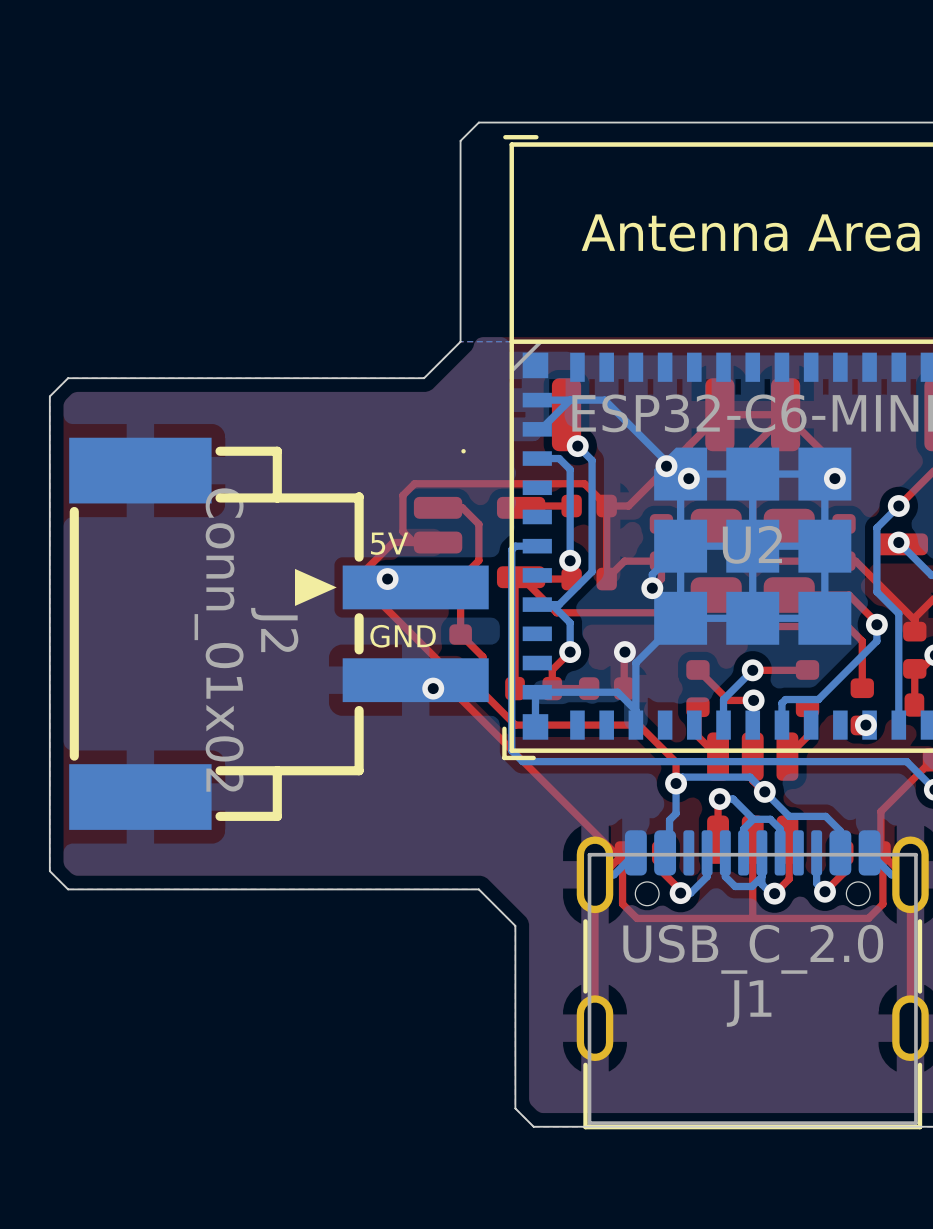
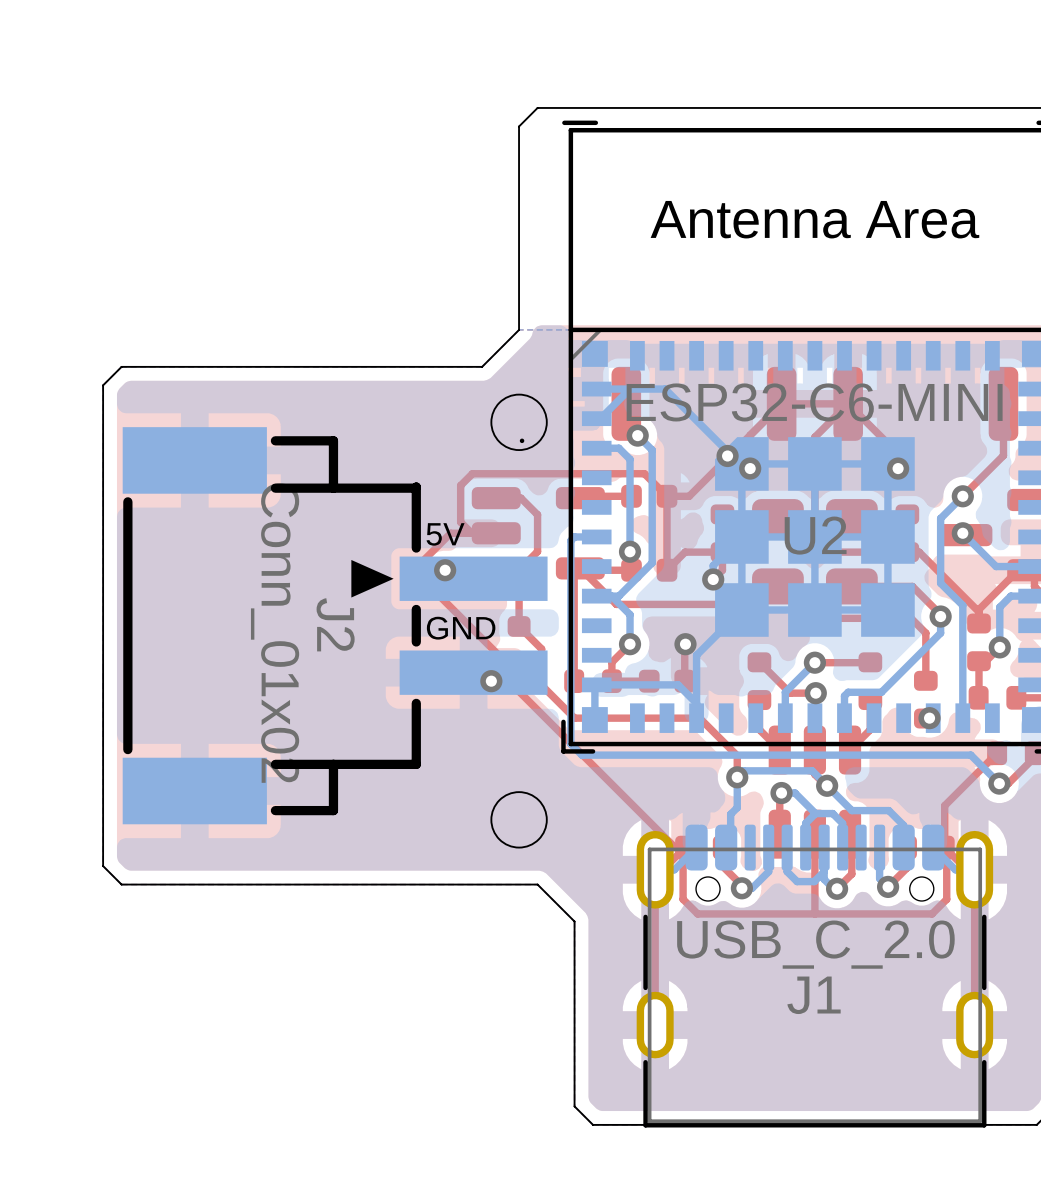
round board edge: none -> [490, 393, 548, 452]
round board edge: none -> [490, 791, 548, 849]

